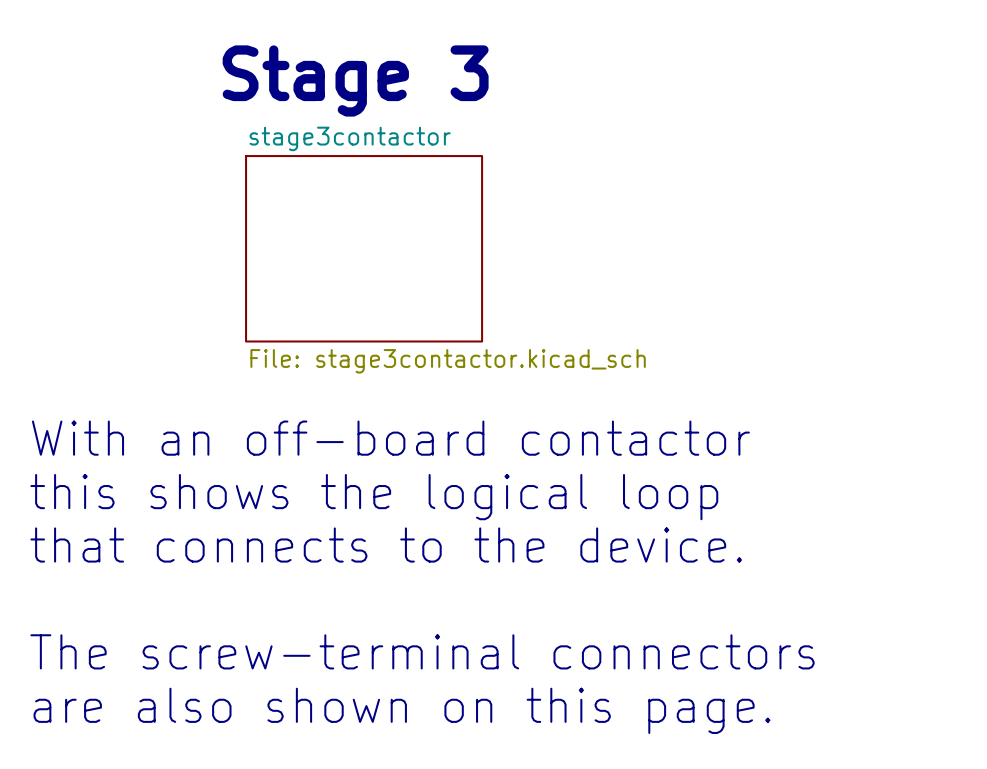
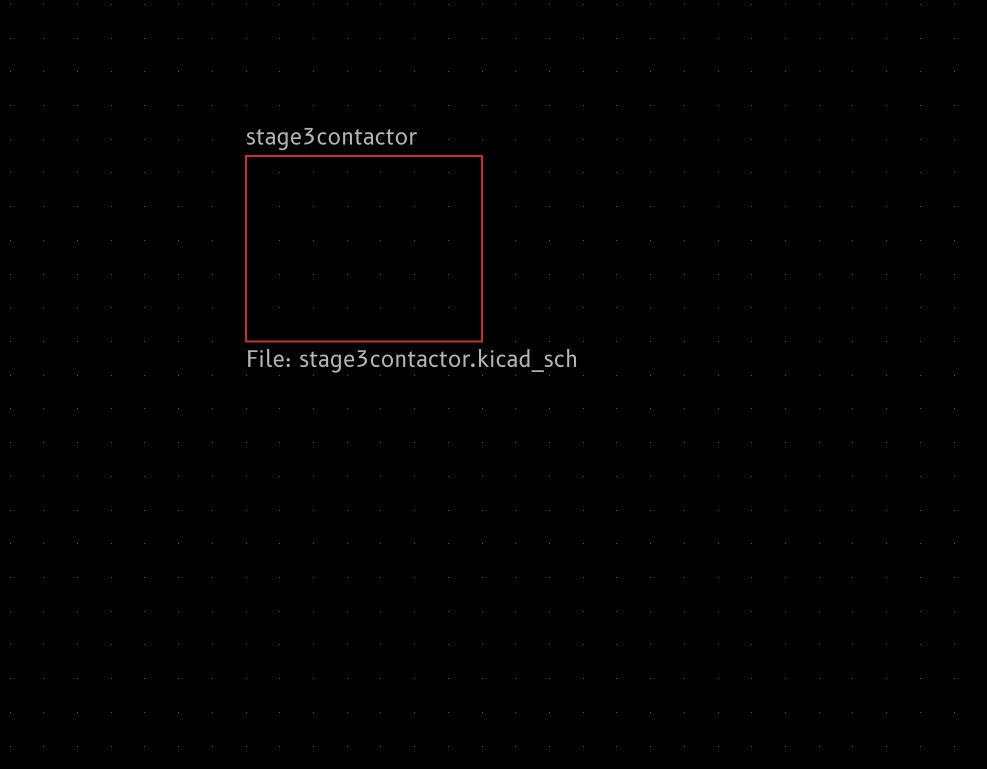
text: Stage 3 (355, 80) -> none
text: With an off-board contactor (390, 438) -> none
text: this shows the logical loop (374, 497) -> none
text: that connects to the device. (386, 544) -> none
text: The screw-terminal connectors (422, 651) -> none
text: are also shown on this page. (401, 710) -> none

